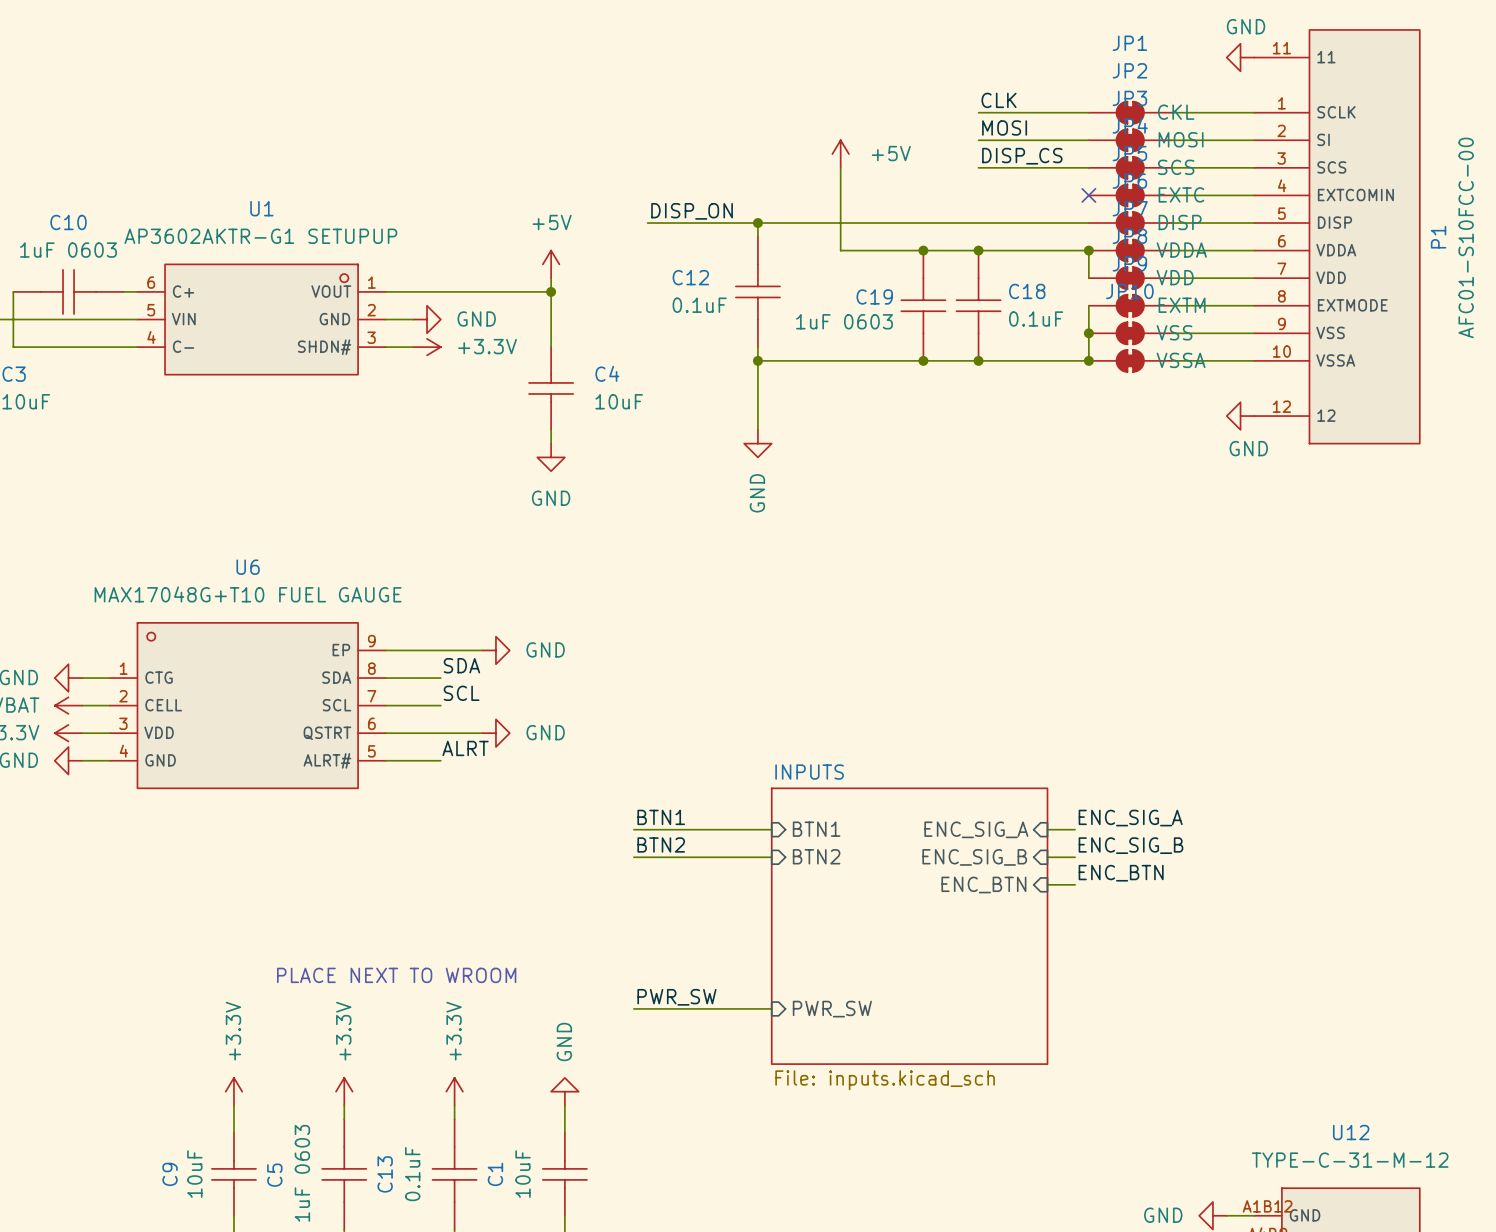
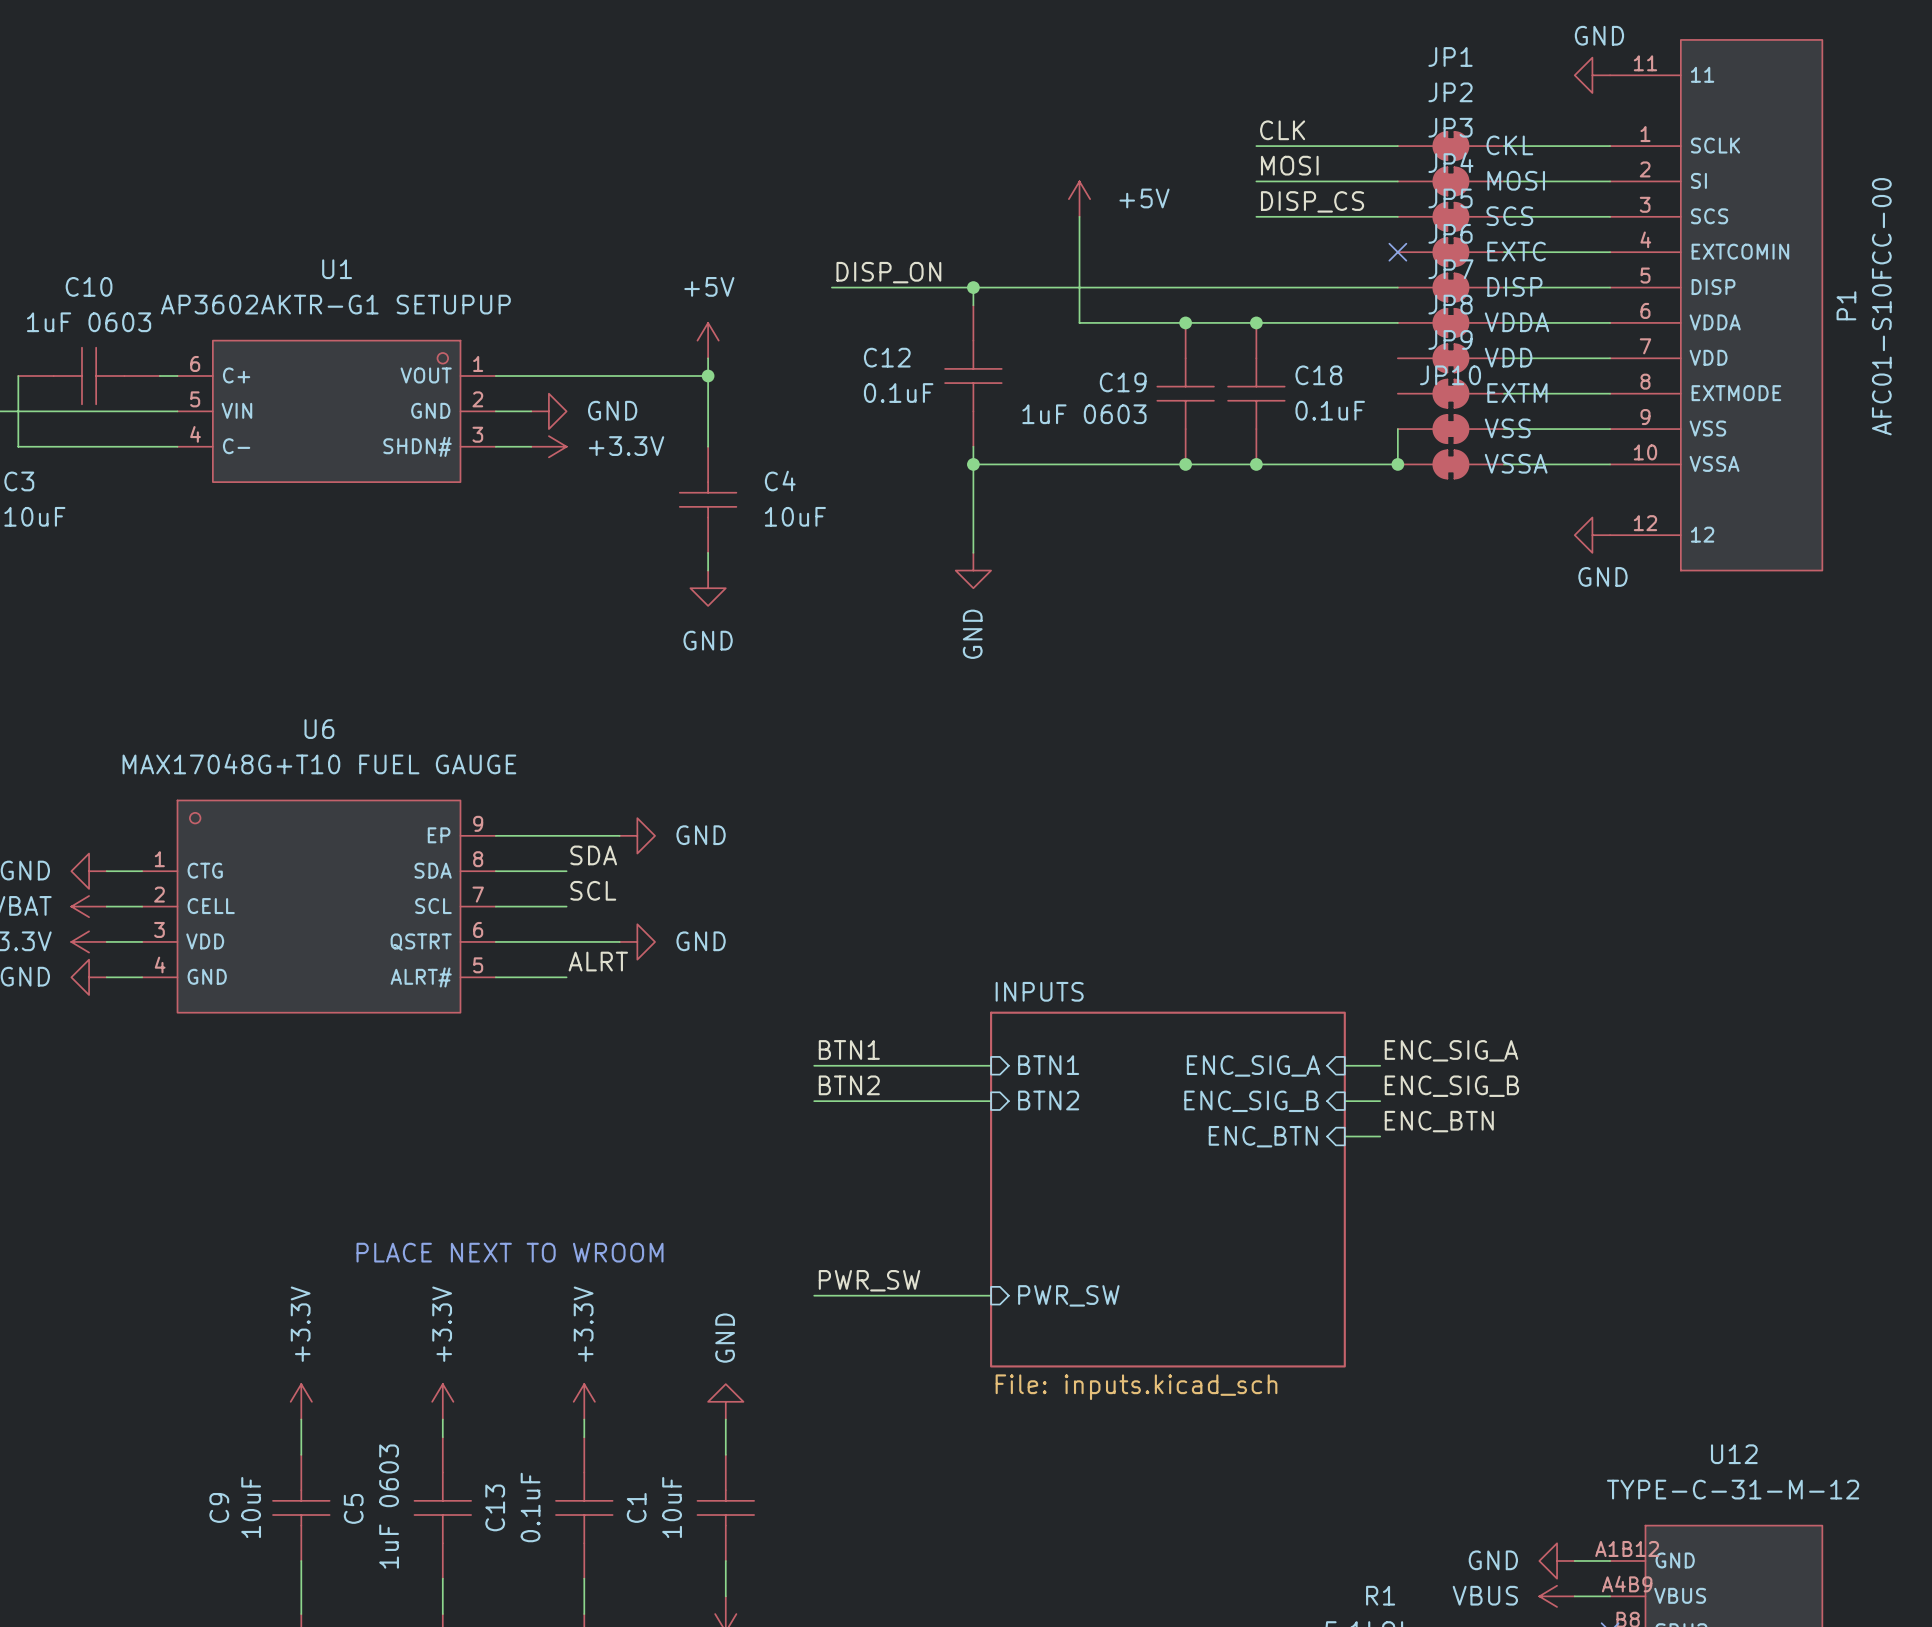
wire: (1088, 250) (1088, 278) -> none
junction: (1088, 250) -> none
wire: (1088, 305) (1088, 333) -> none
junction: (1088, 333) -> none

